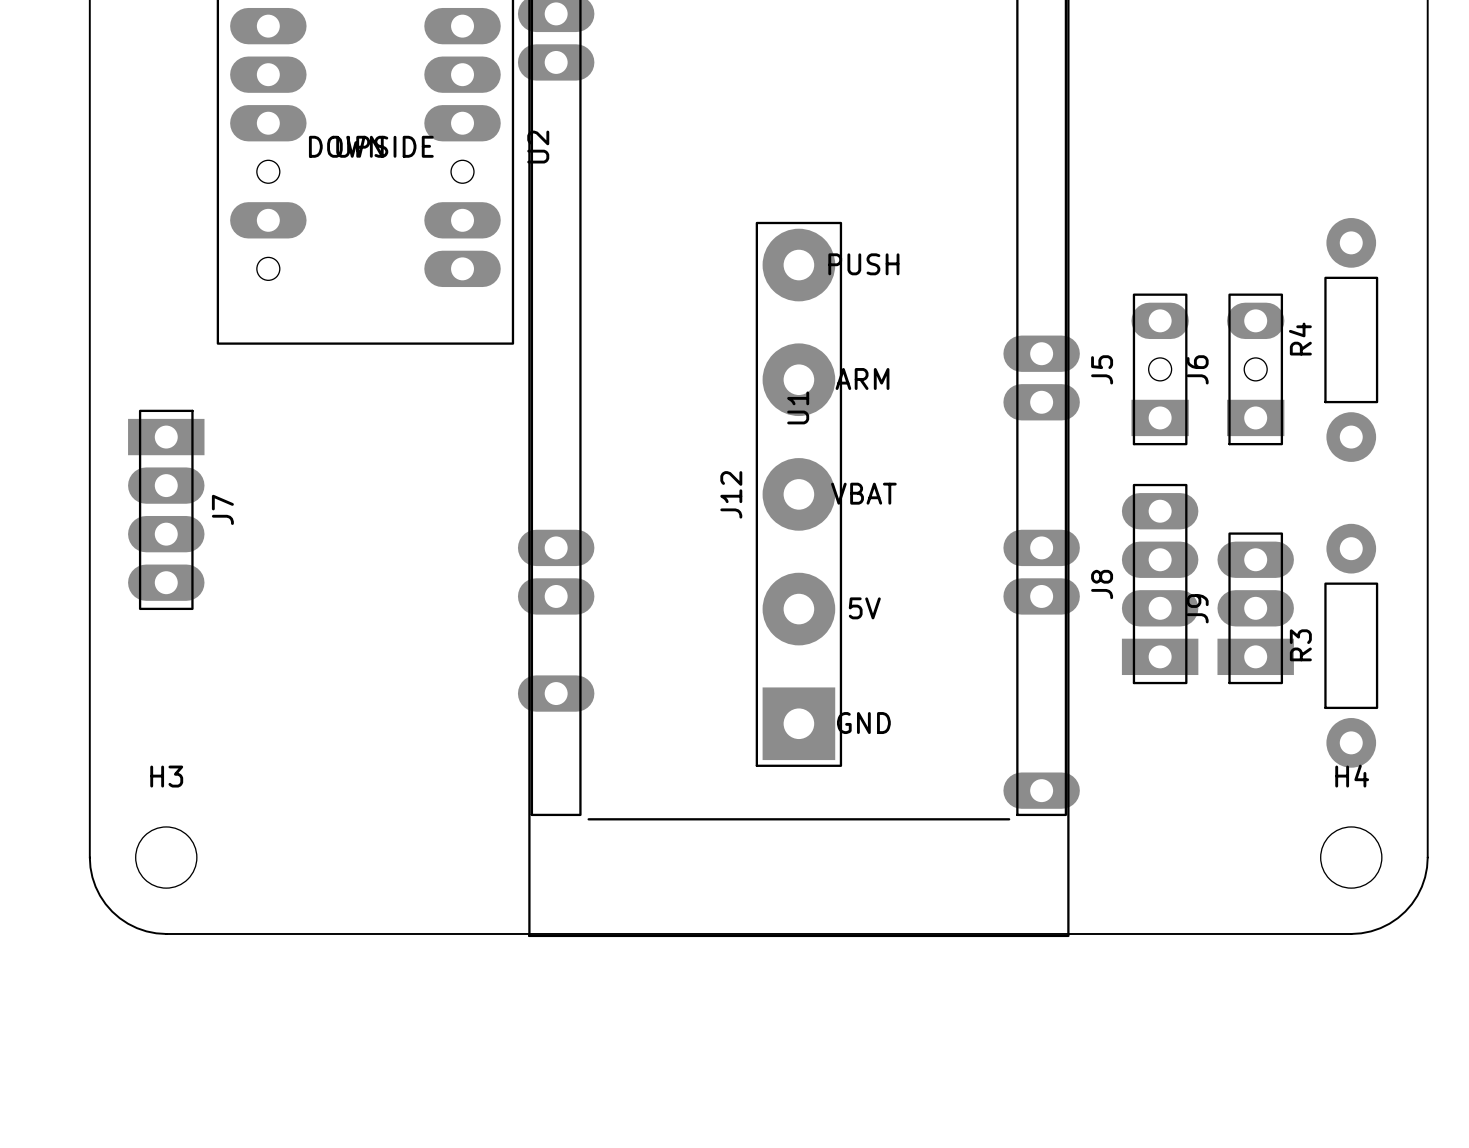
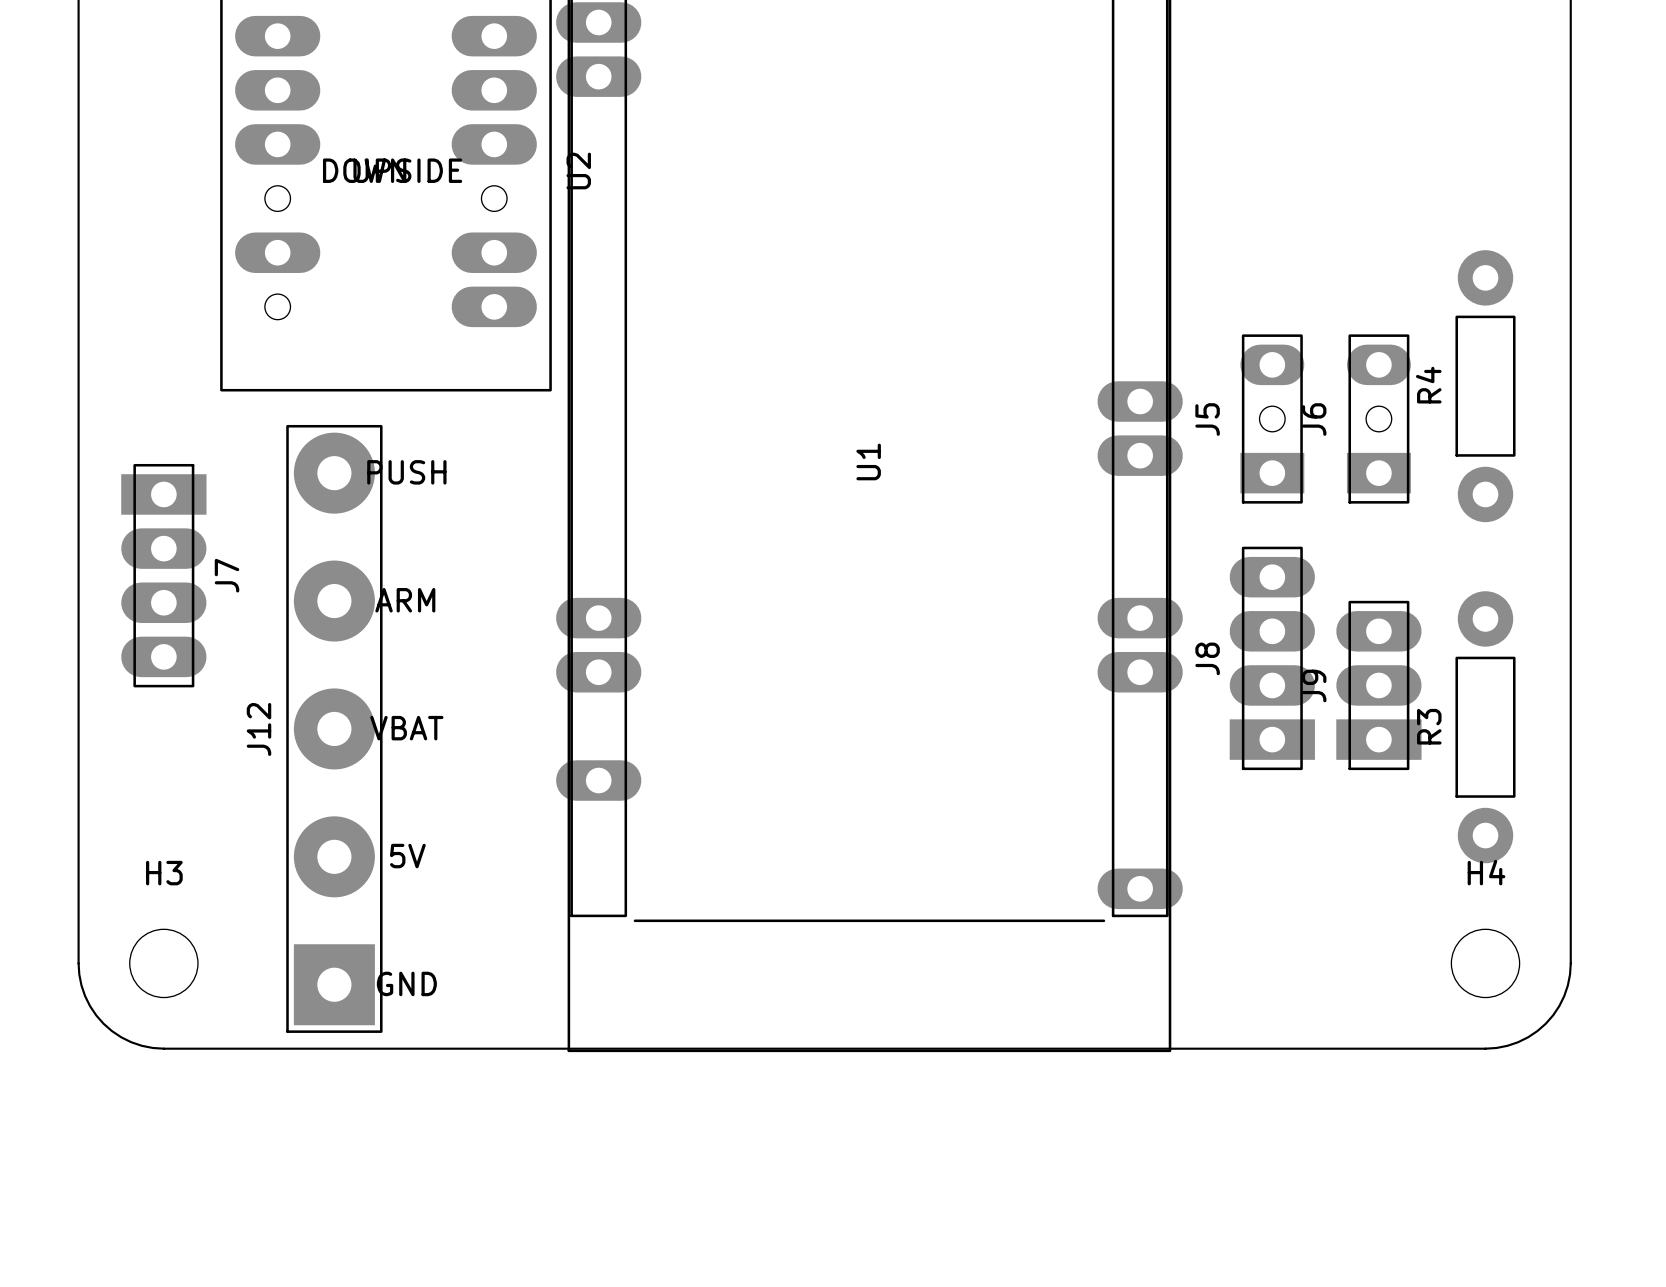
J12 position: (798, 494) -> (334, 728)

